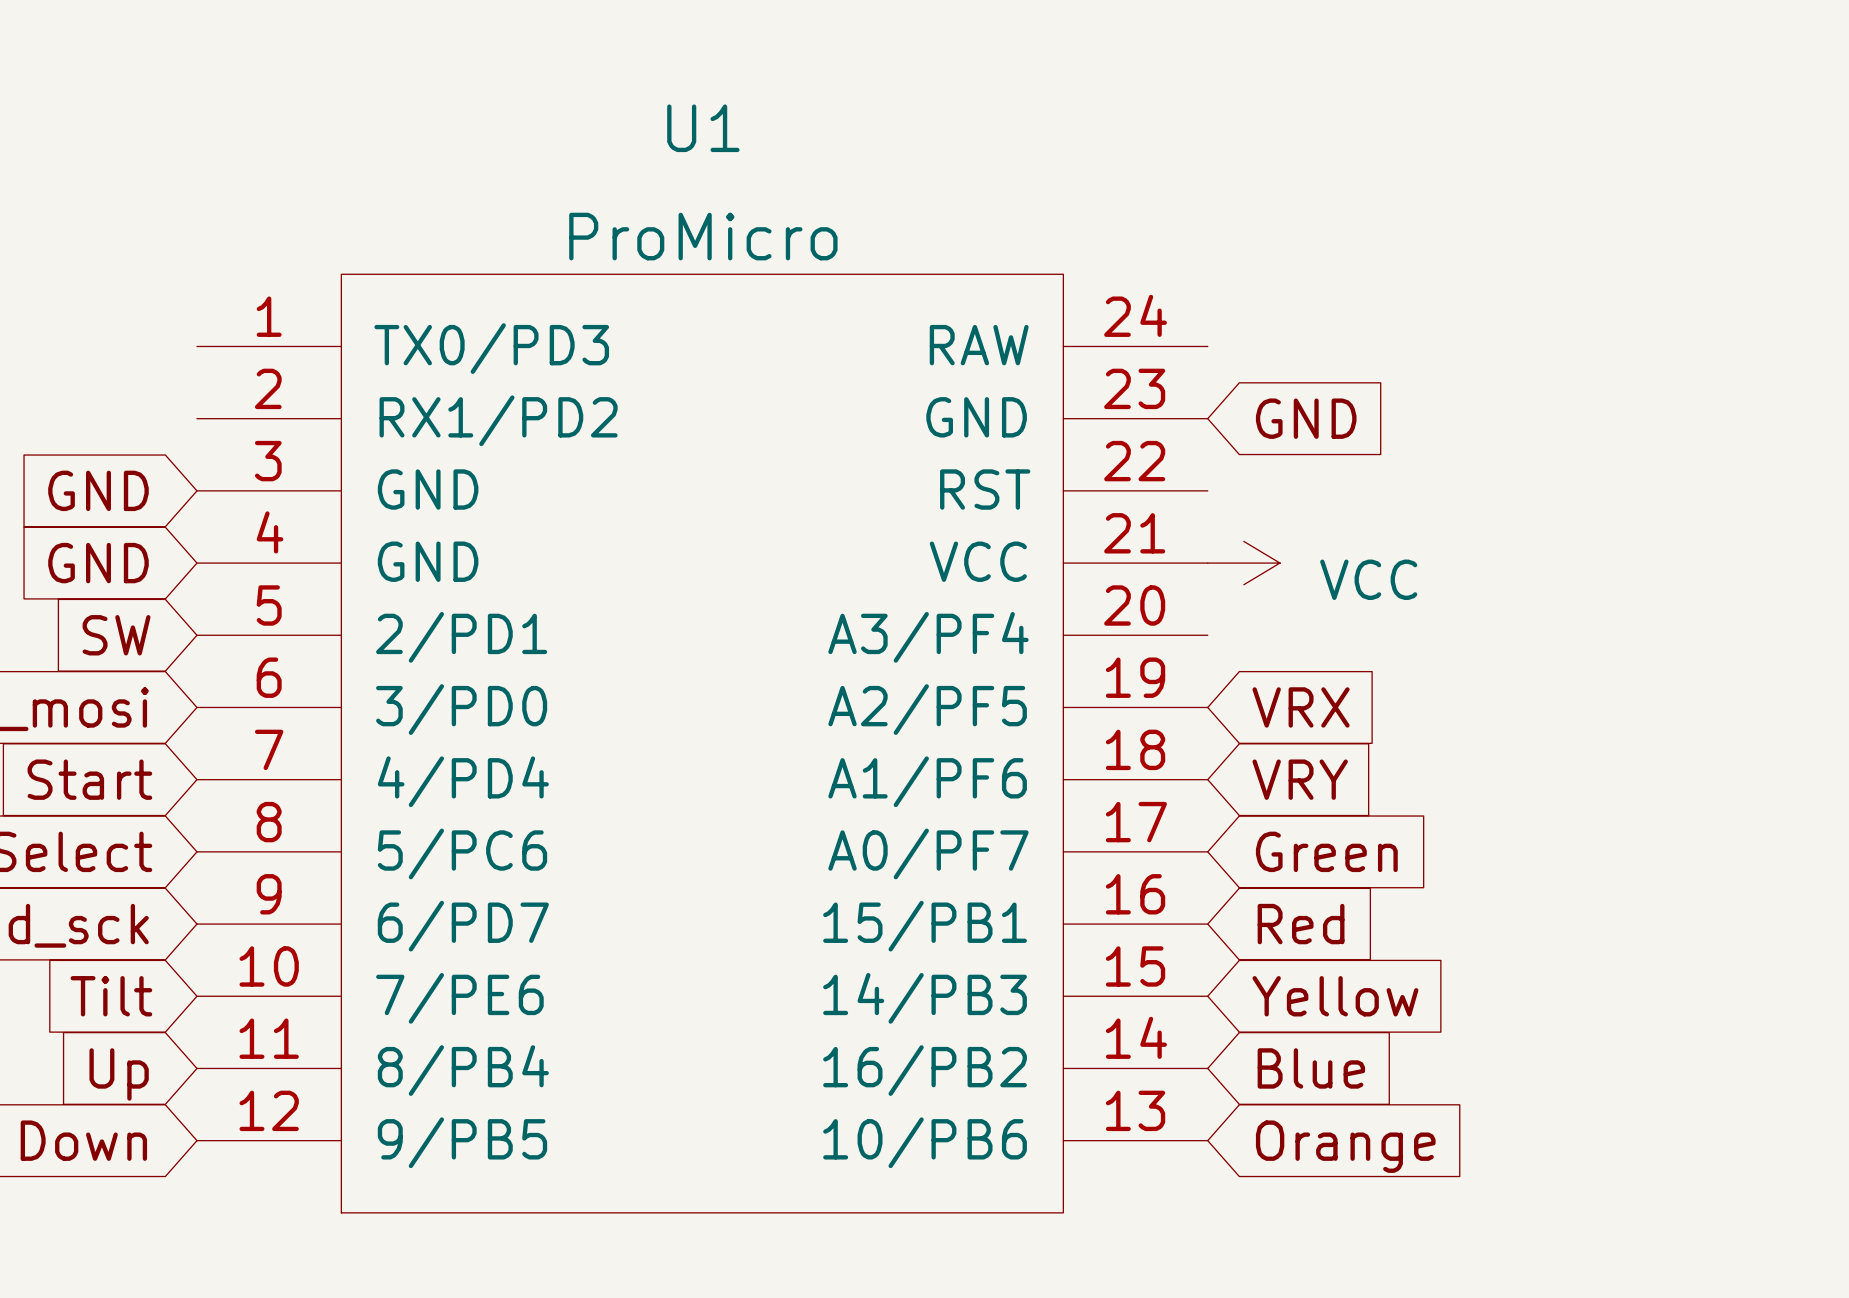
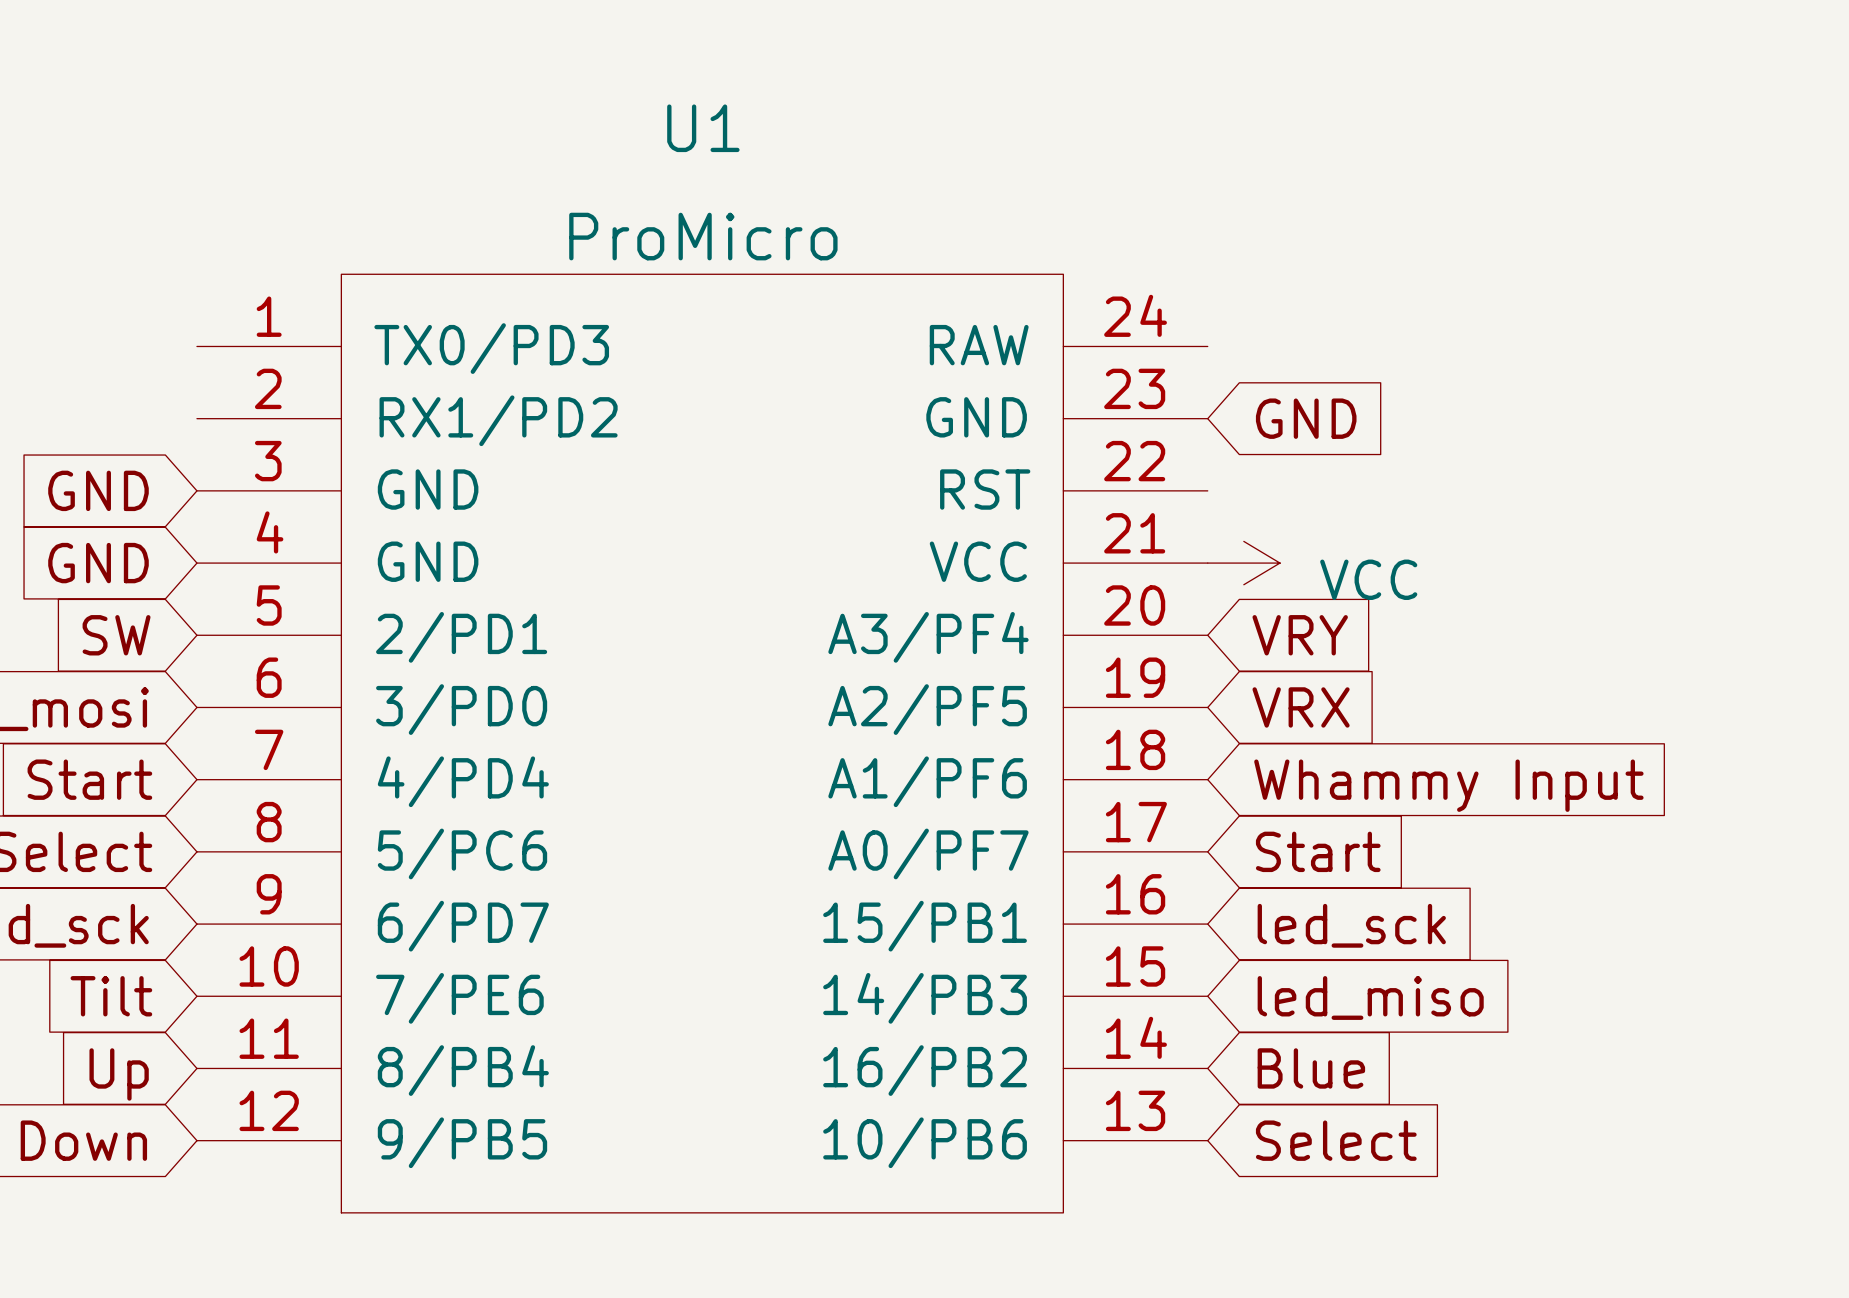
global label: none -> VRY (1300, 635)
global label: VRY (1300, 779) -> Whammy Input (1448, 785)
global label: Green (1326, 851) -> Start (1318, 851)
global label: Red (1301, 924) -> led_sck (1351, 925)
global label: Yellow (1335, 996) -> led_miso (1370, 997)
global label: Orange (1345, 1146) -> Select (1336, 1140)

